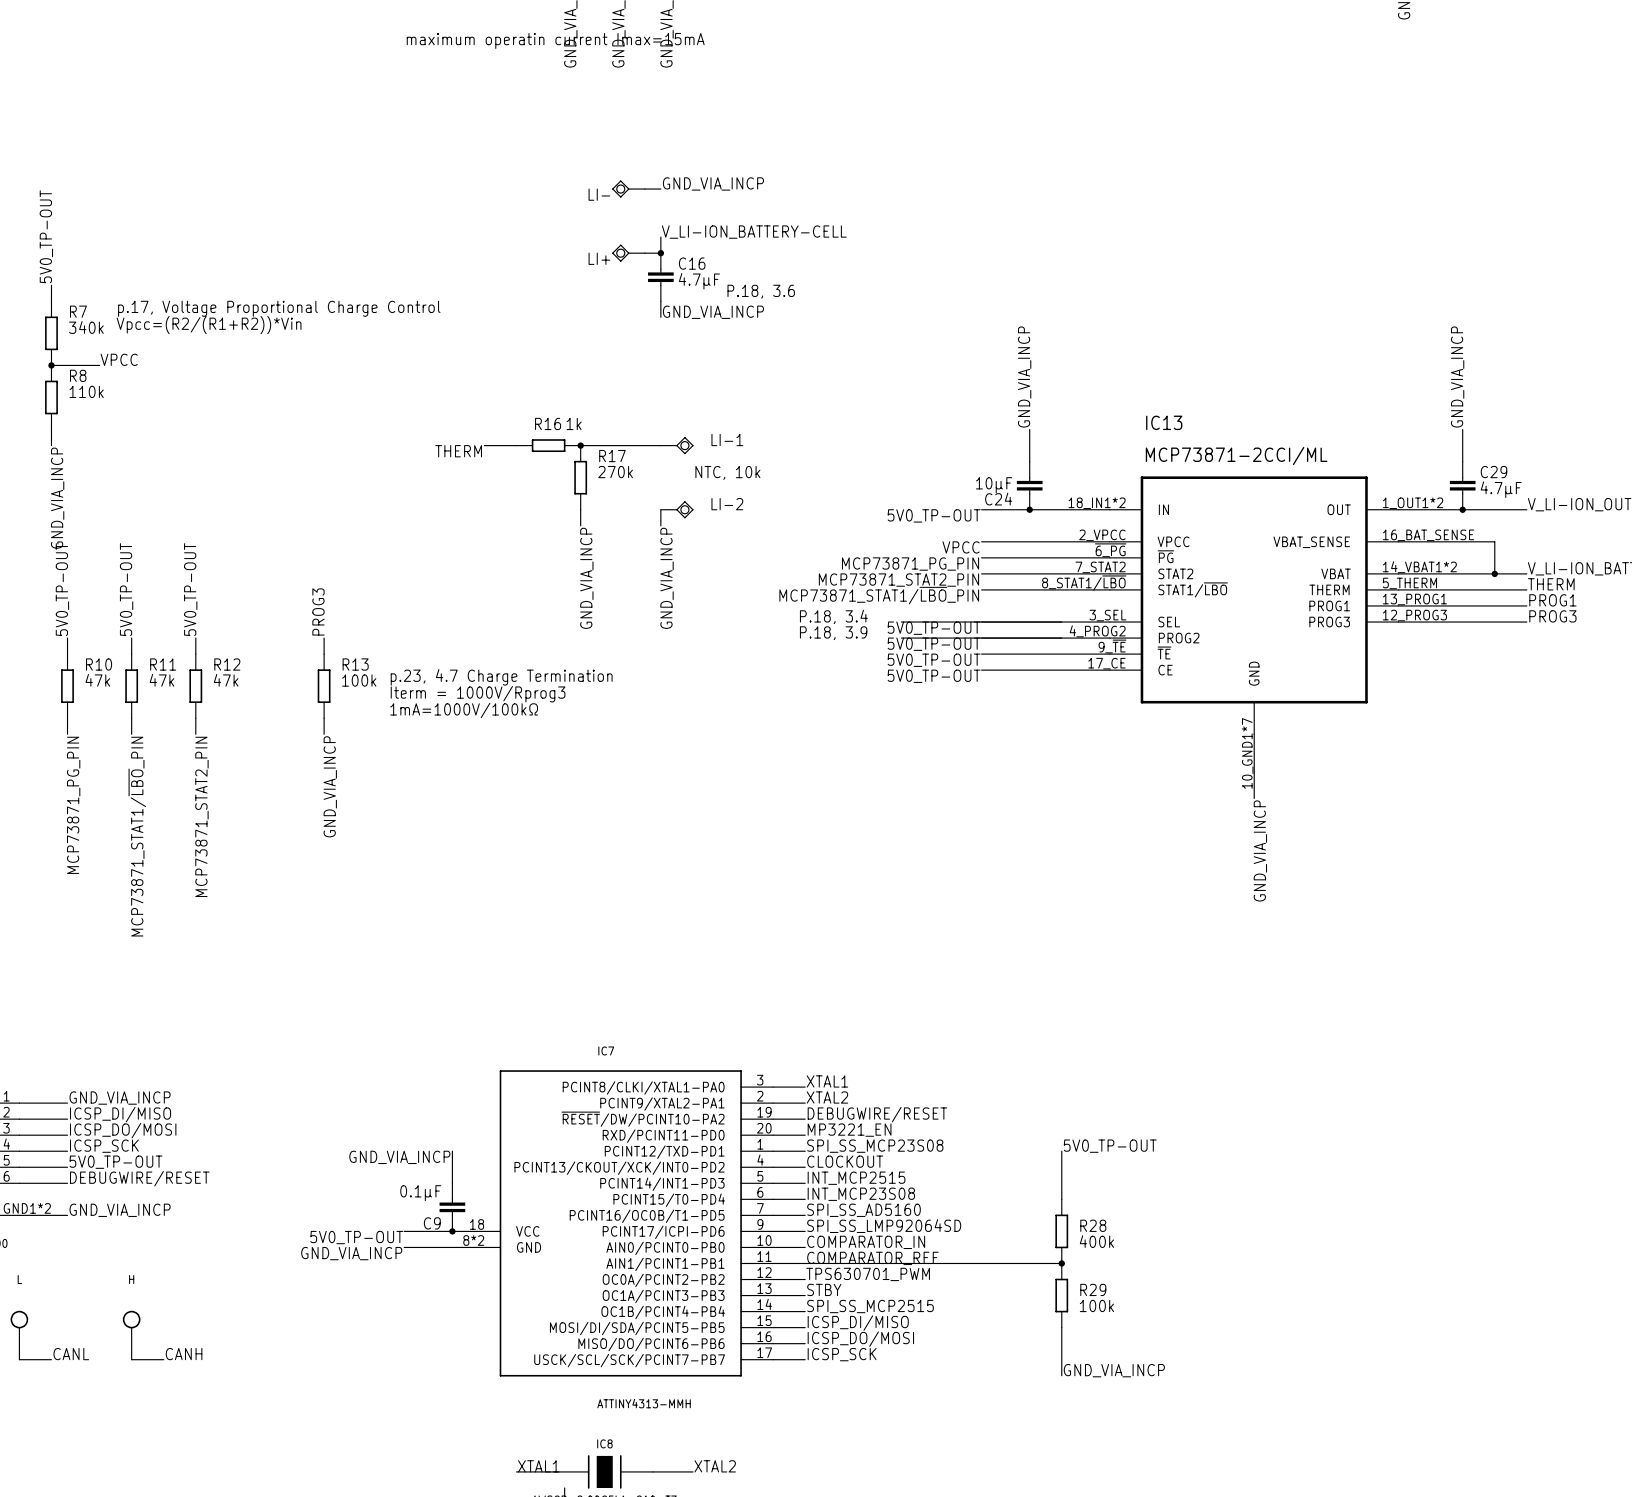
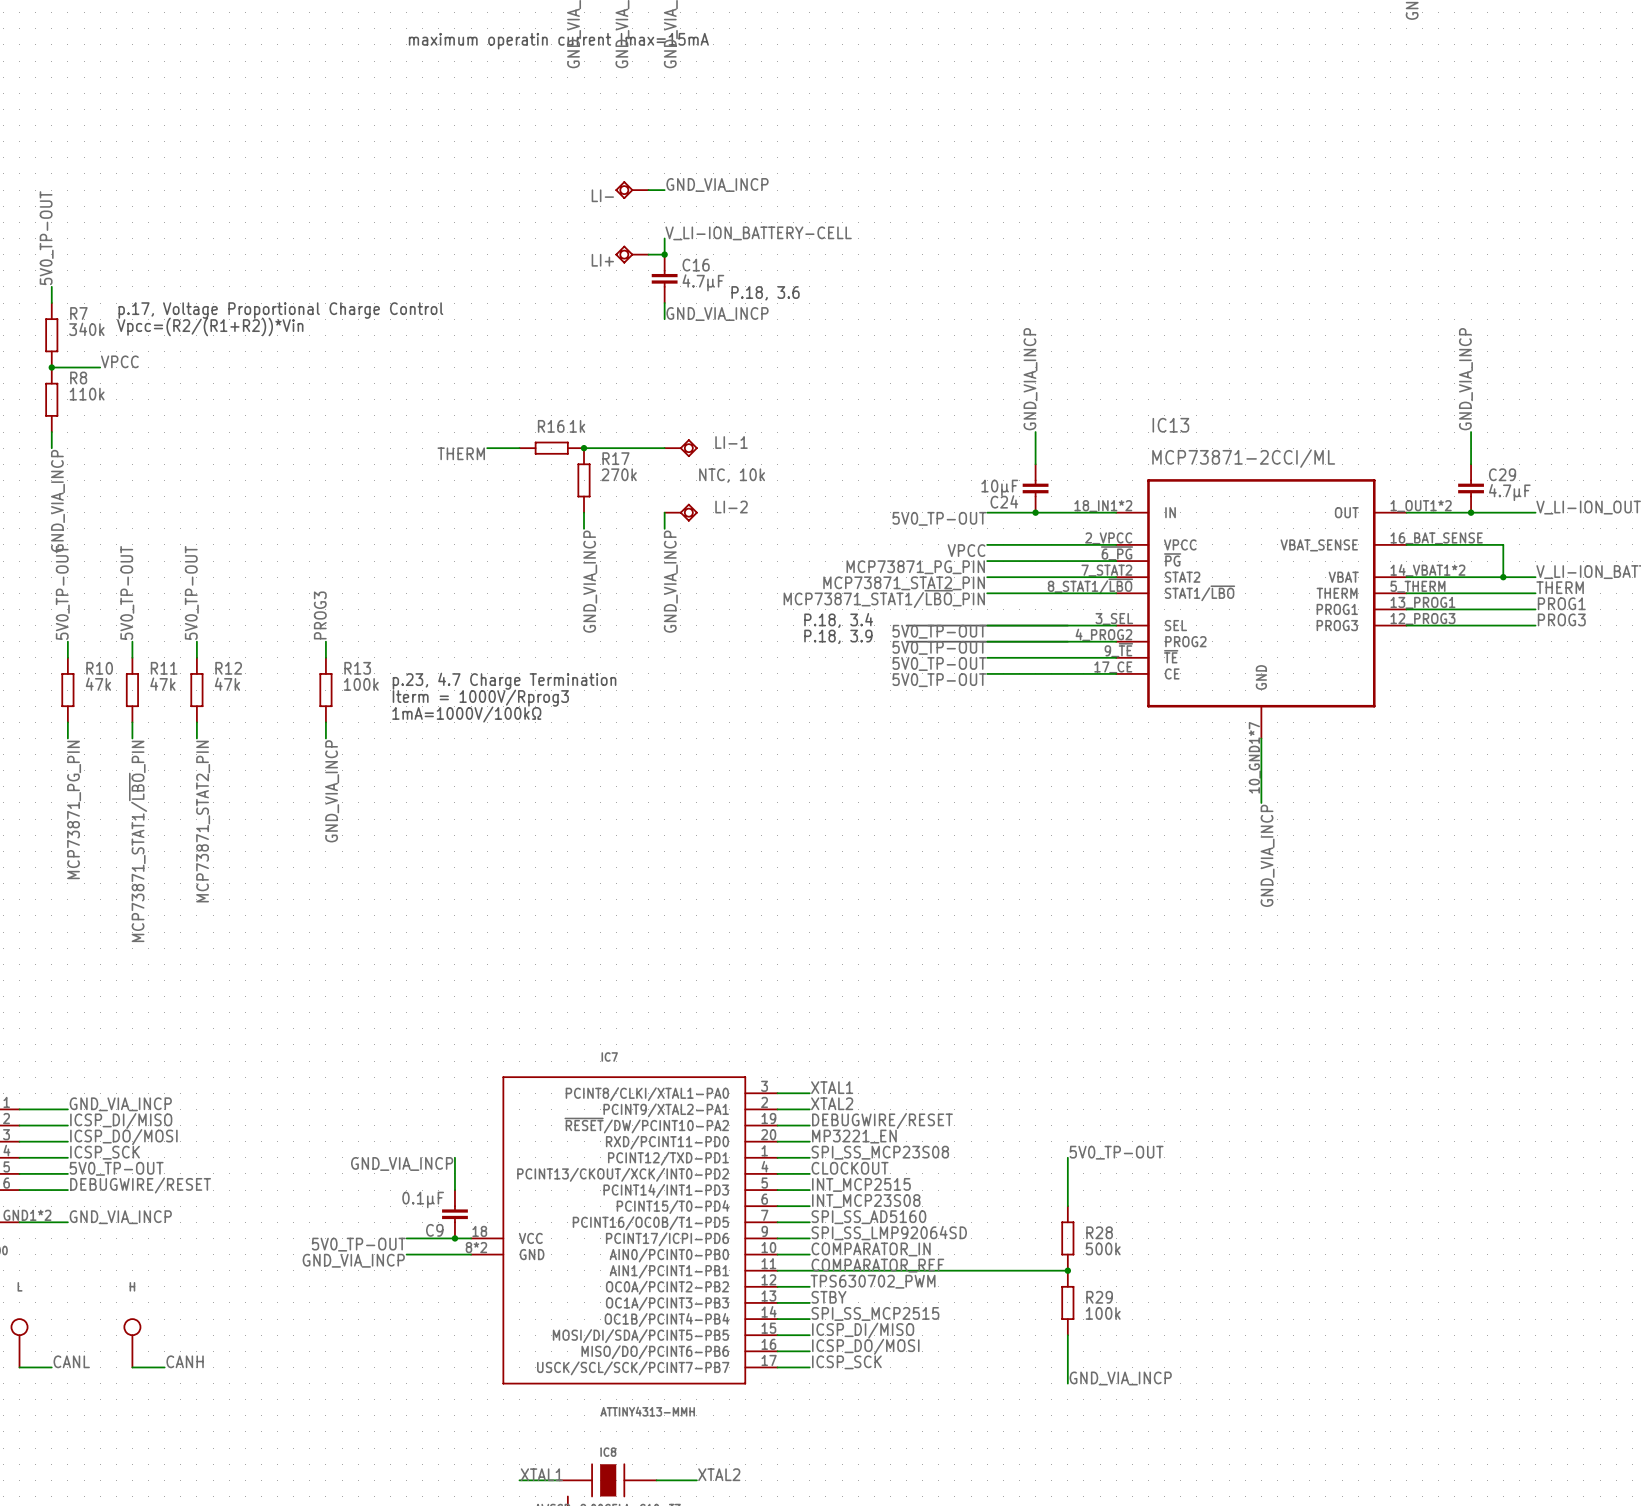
R28 value: 400k (1096, 1241) -> 500k (1103, 1248)
label: TPS630701_PWM (868, 1274) -> TPS630702_PWM (873, 1281)

